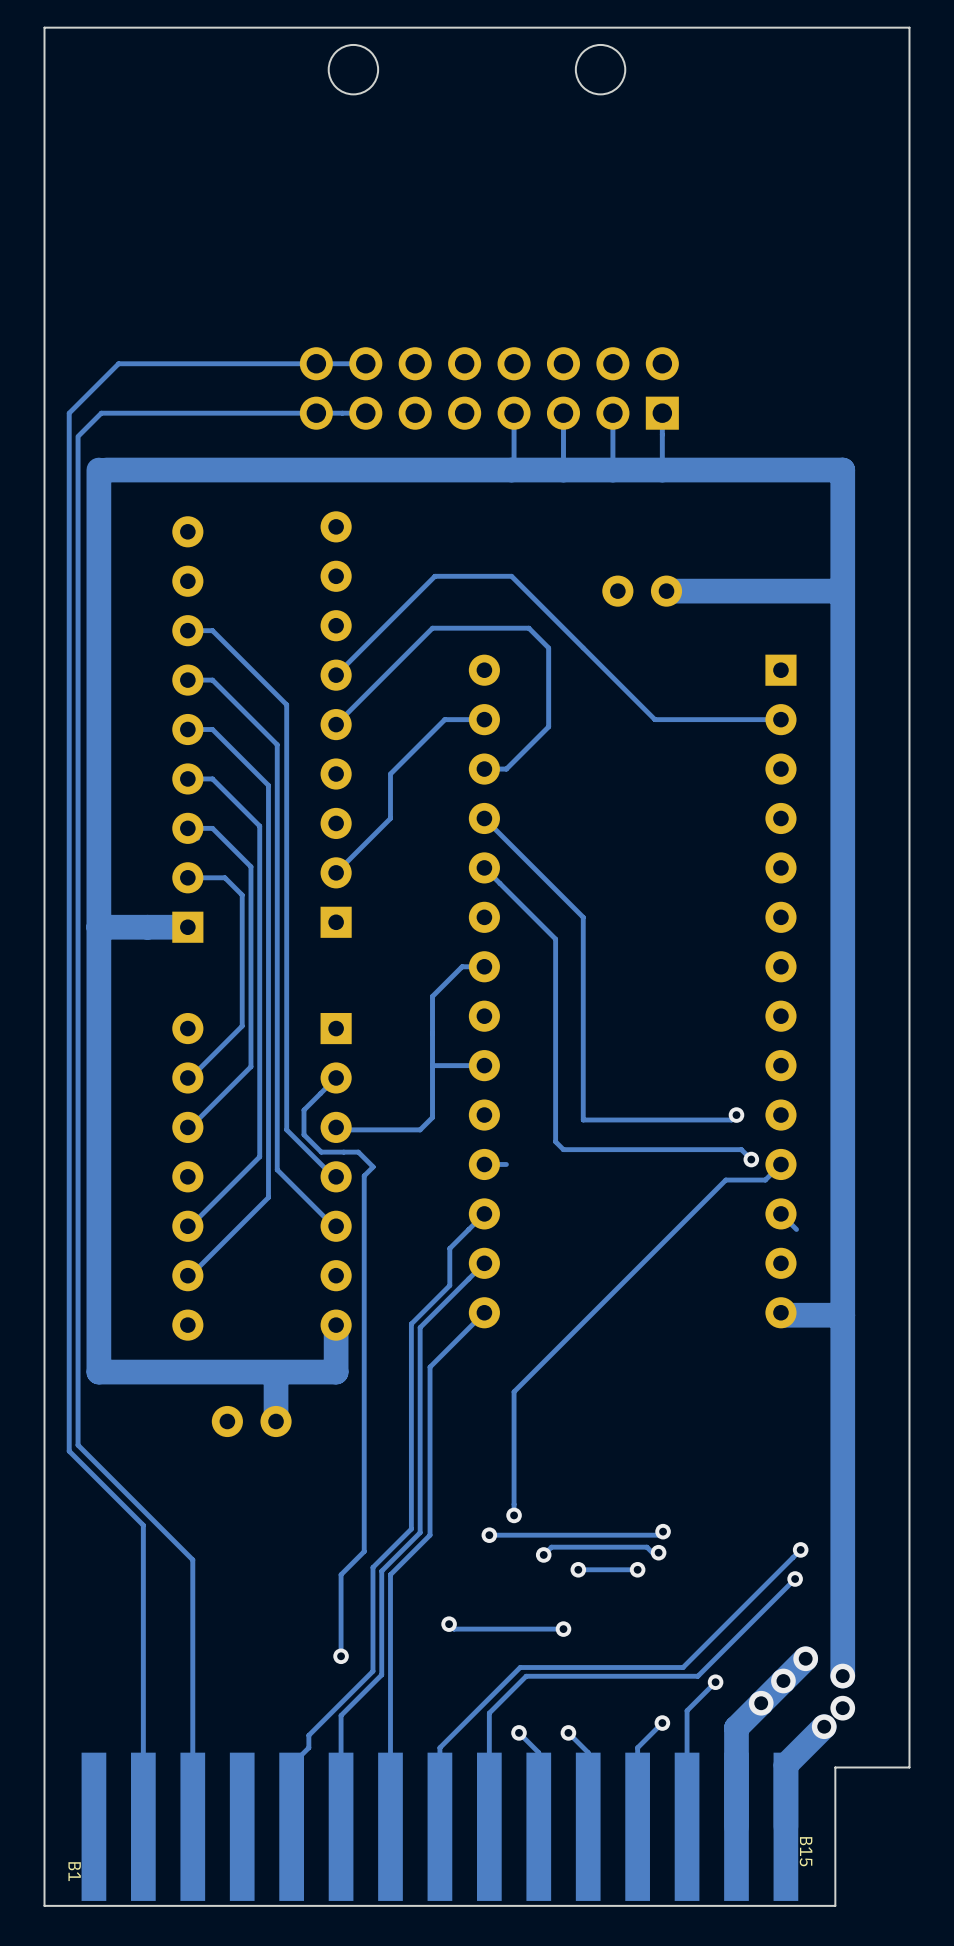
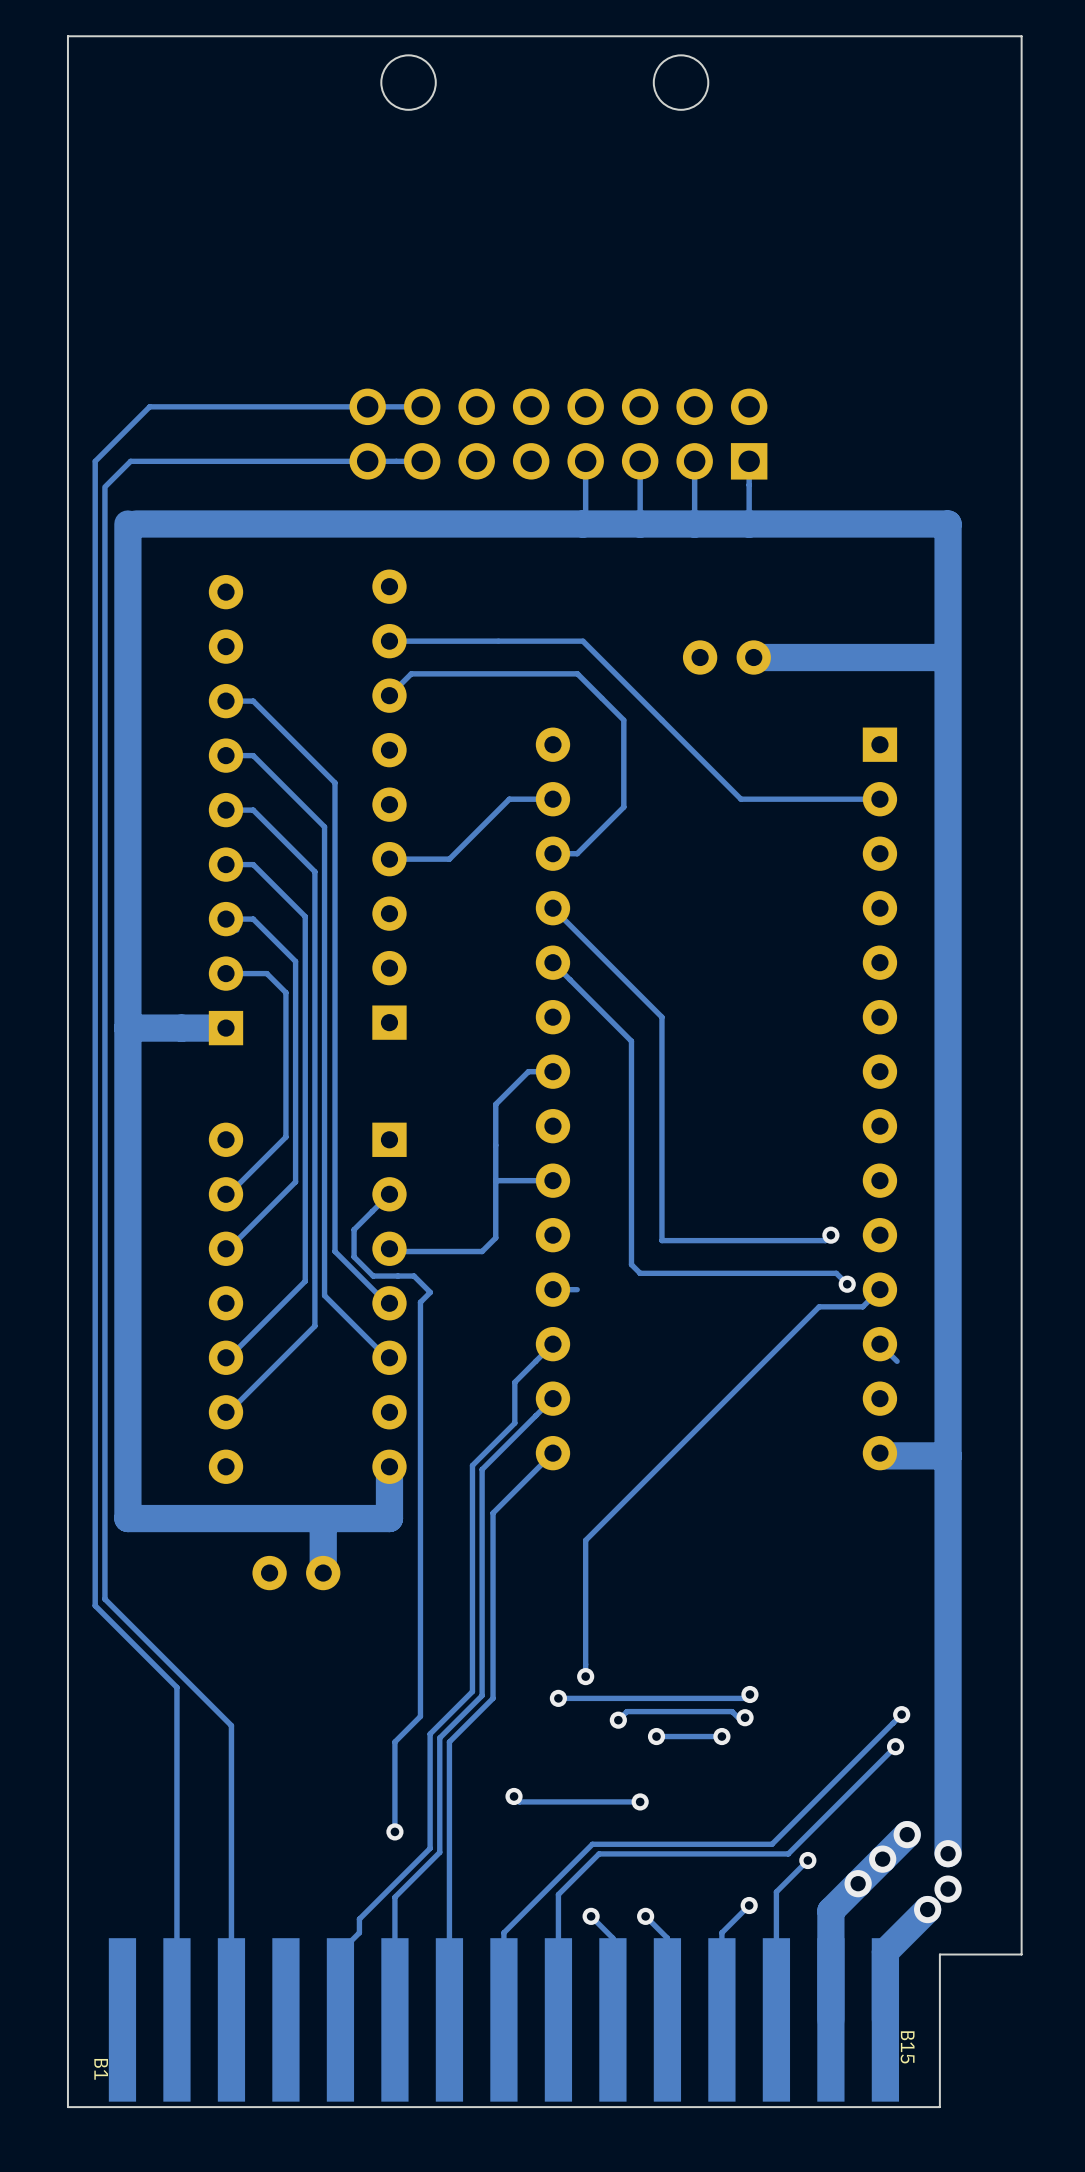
track: (434, 576) (336, 675) -> (498, 641) (389, 641)
track: (528, 628) (432, 628) (336, 724) -> (602, 698) (577, 673) (411, 673) (389, 695)
track: (390, 774) (390, 818) (336, 872) -> (449, 859) (389, 859)

